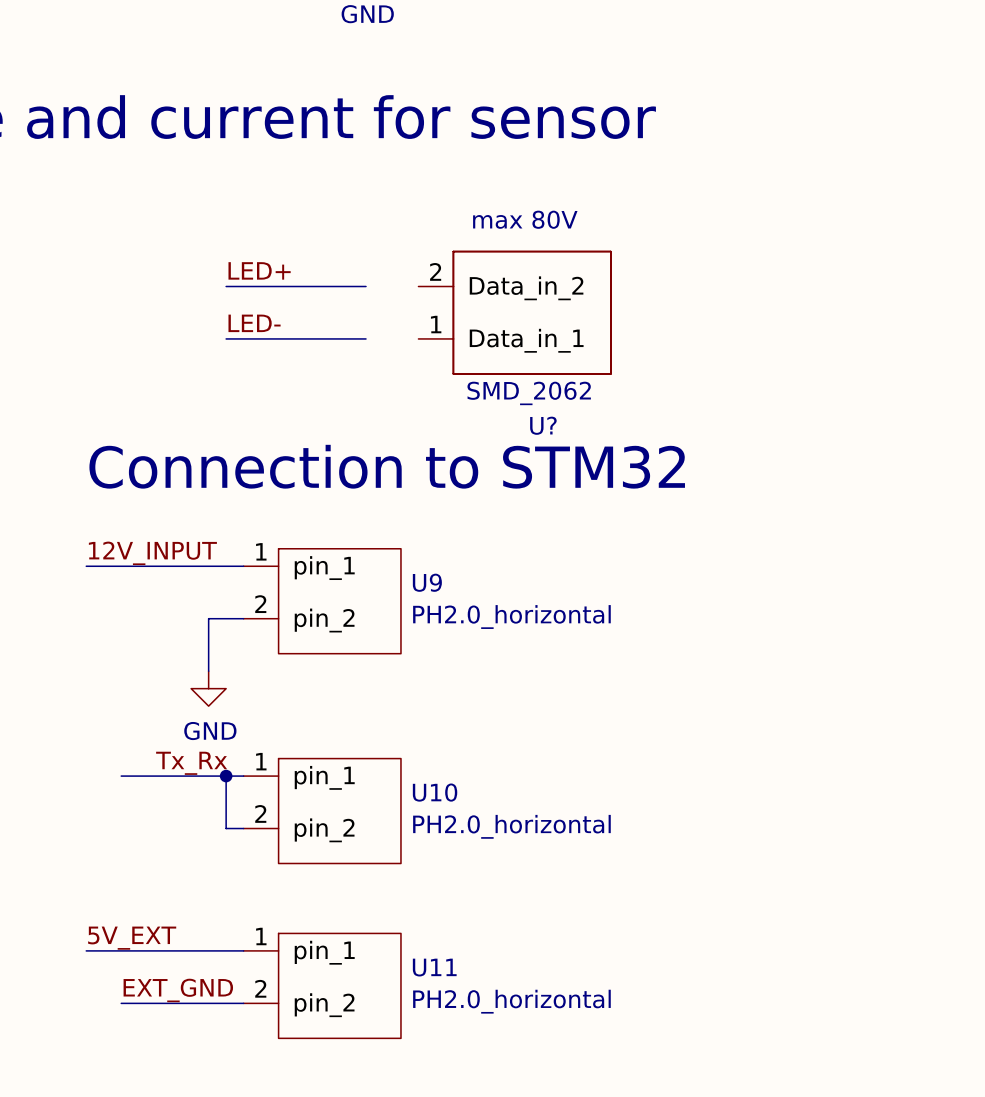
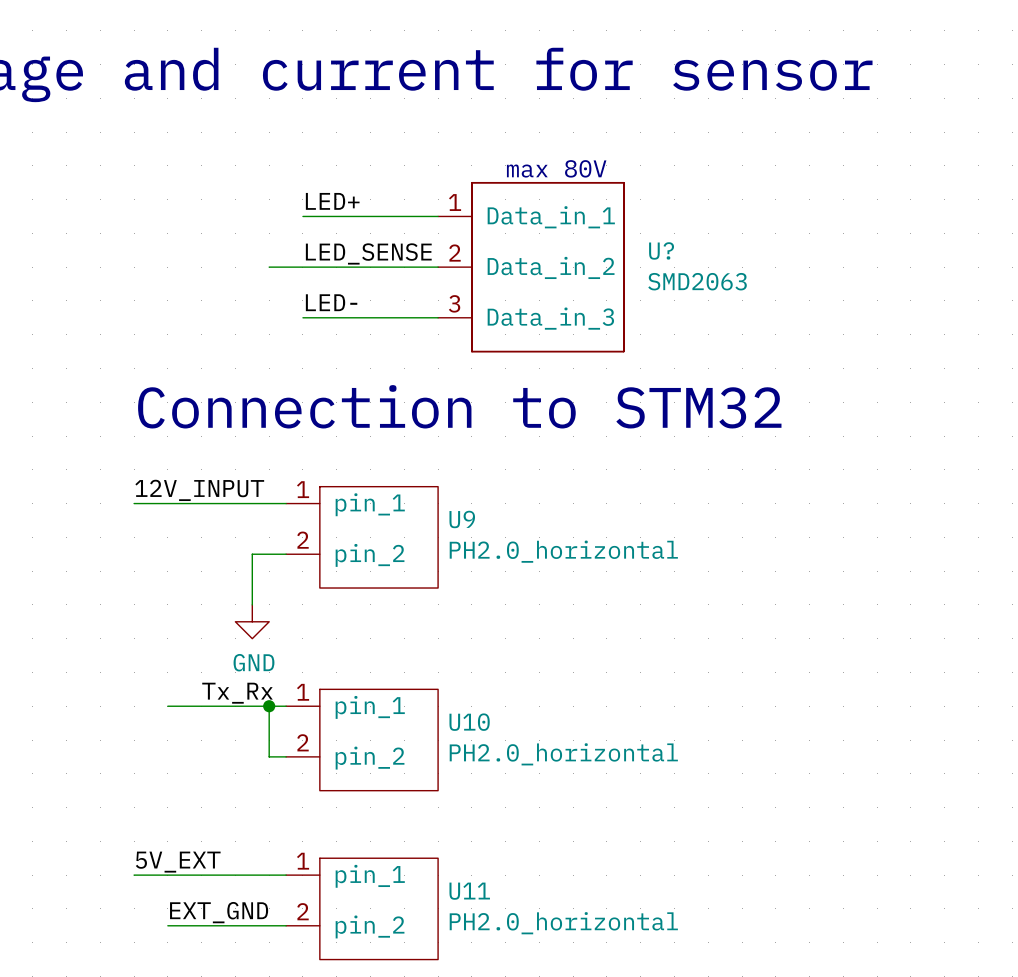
label position: LED+ (259, 270) -> LED+ (332, 201)
wire: (226, 286) (366, 286) -> (302, 216) (438, 216)
label: none -> LED_SENSE (368, 253)
U?: SMD_2062 (514, 312) -> none
wire: none -> (269, 267) (438, 267)
U?: none -> SMD2063 (530, 267)
label position: LED- (254, 323) -> LED- (331, 302)
wire: (226, 338) (366, 338) -> (302, 317) (438, 317)

